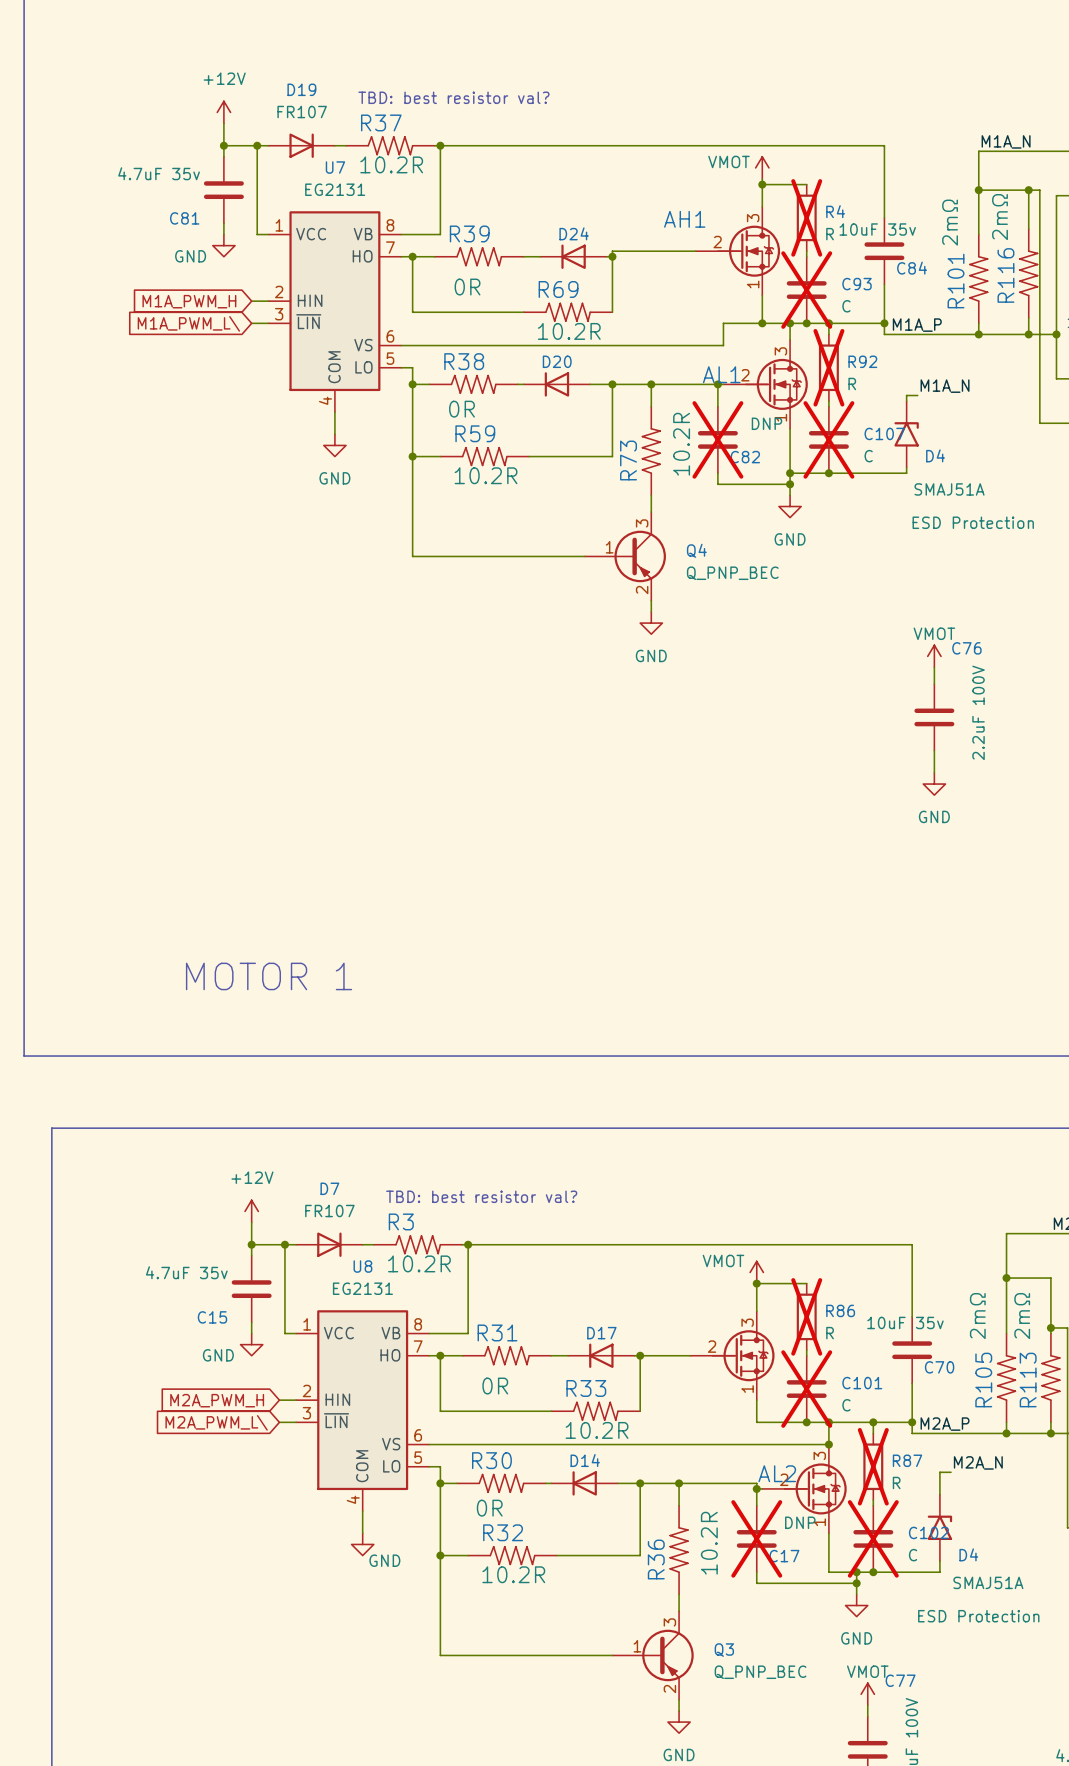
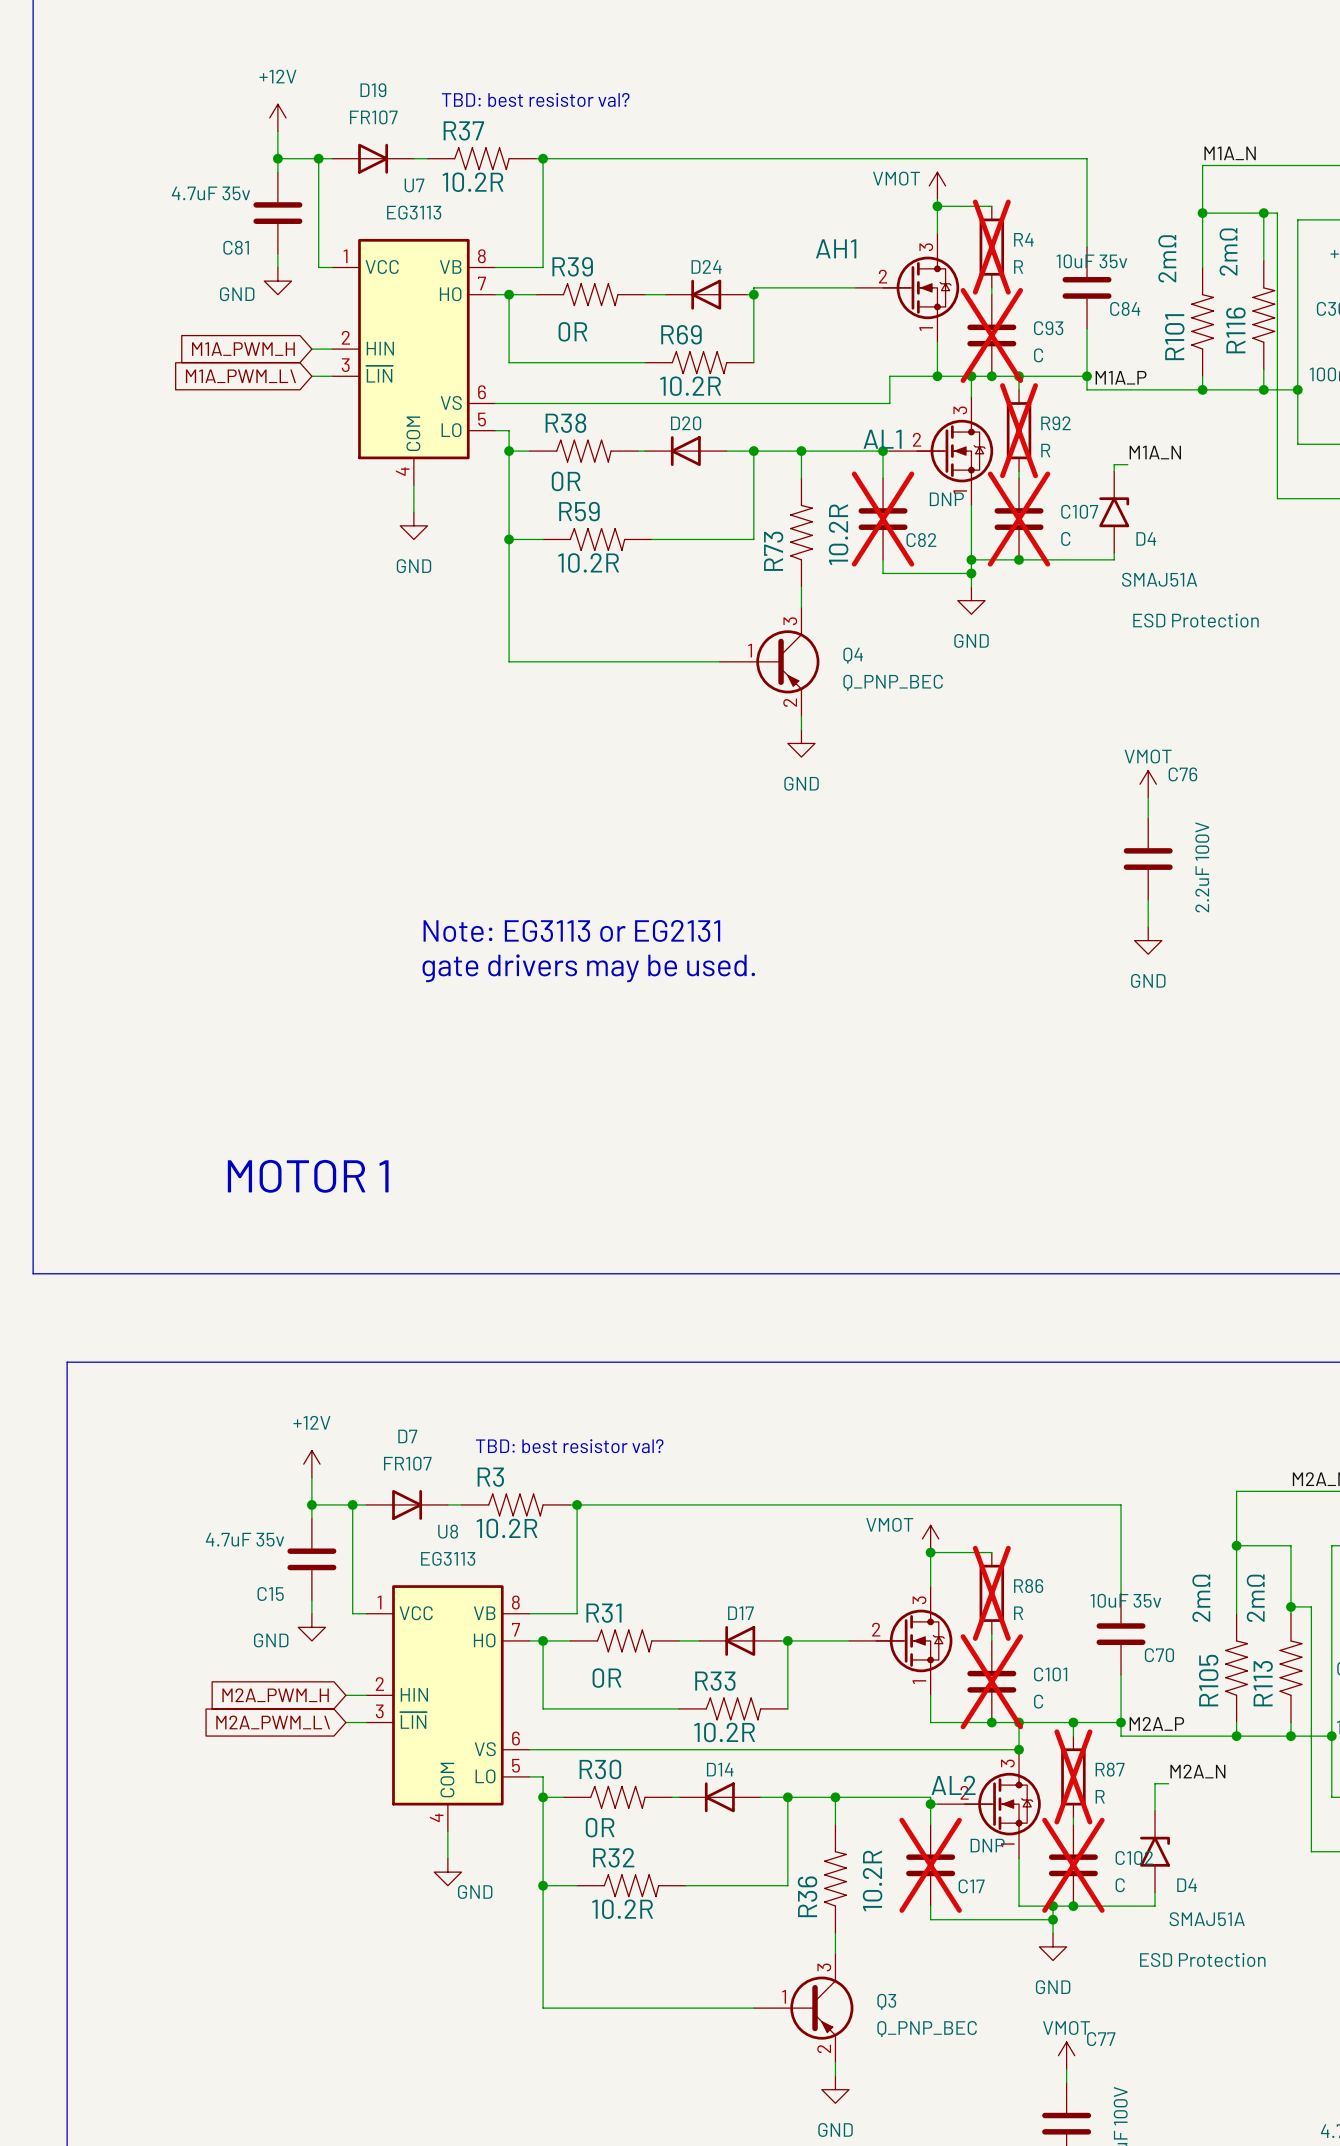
U7 value: EG2131 (335, 189) -> EG3113 (414, 212)
text: none -> Note: EG3113 or EG2131 (571, 930)
text: none -> gate drivers may be used. (588, 968)
U8 value: EG2131 (362, 1288) -> EG3113 (448, 1558)

